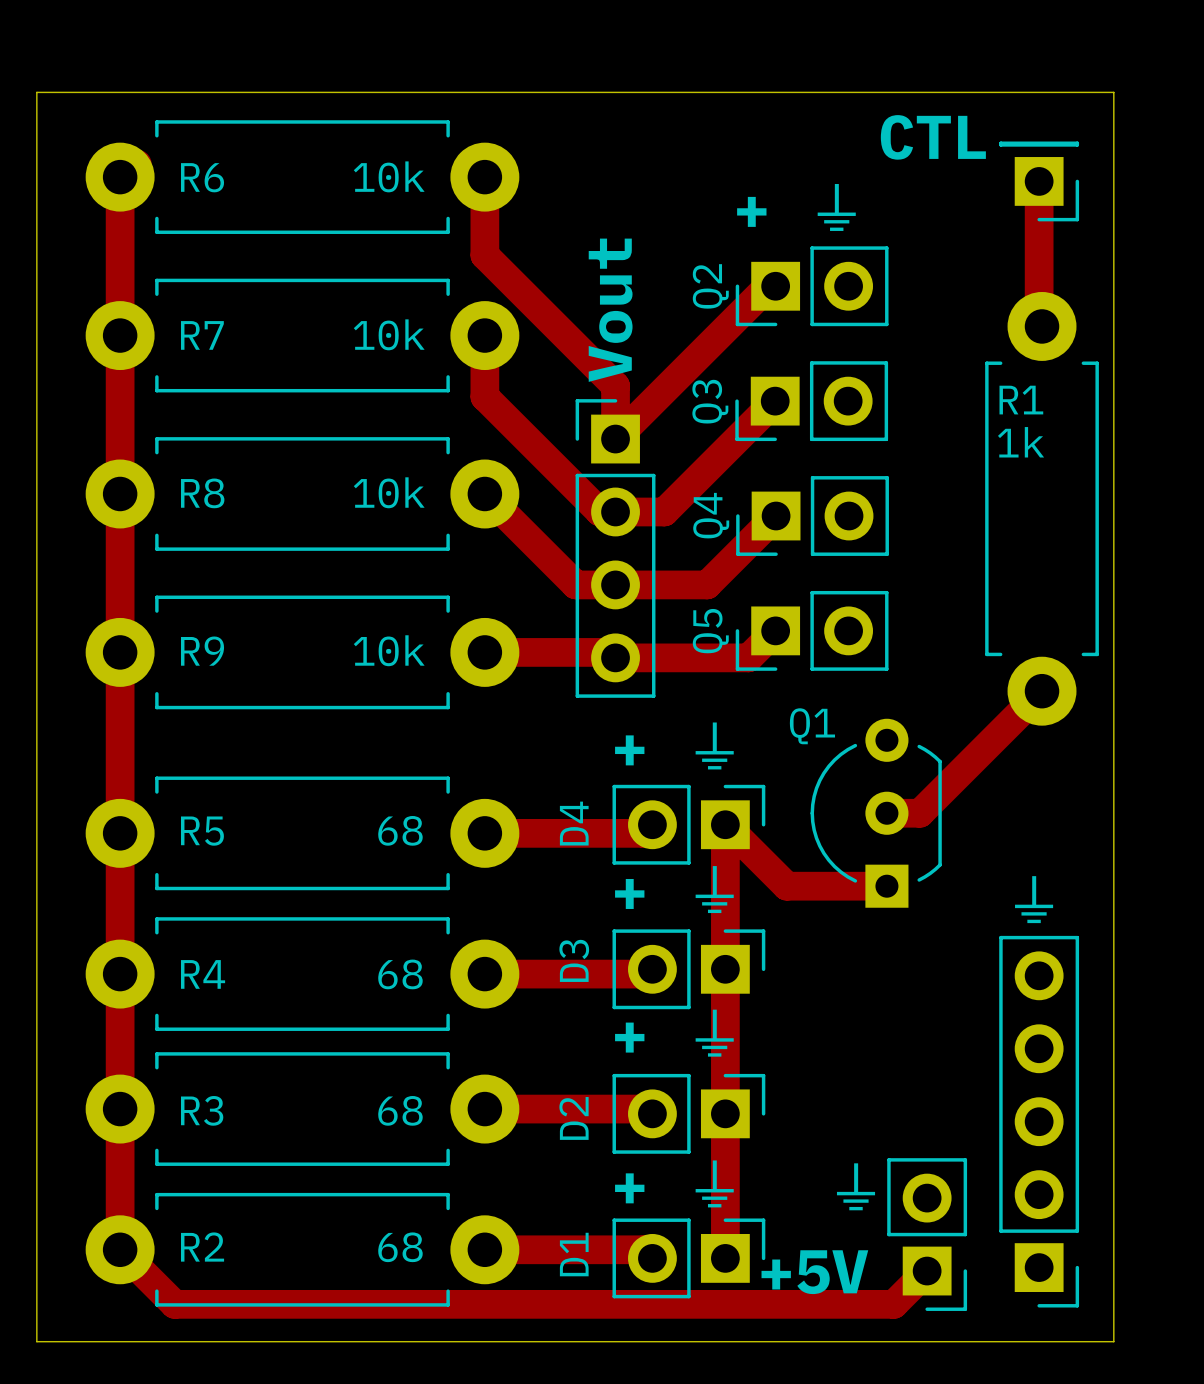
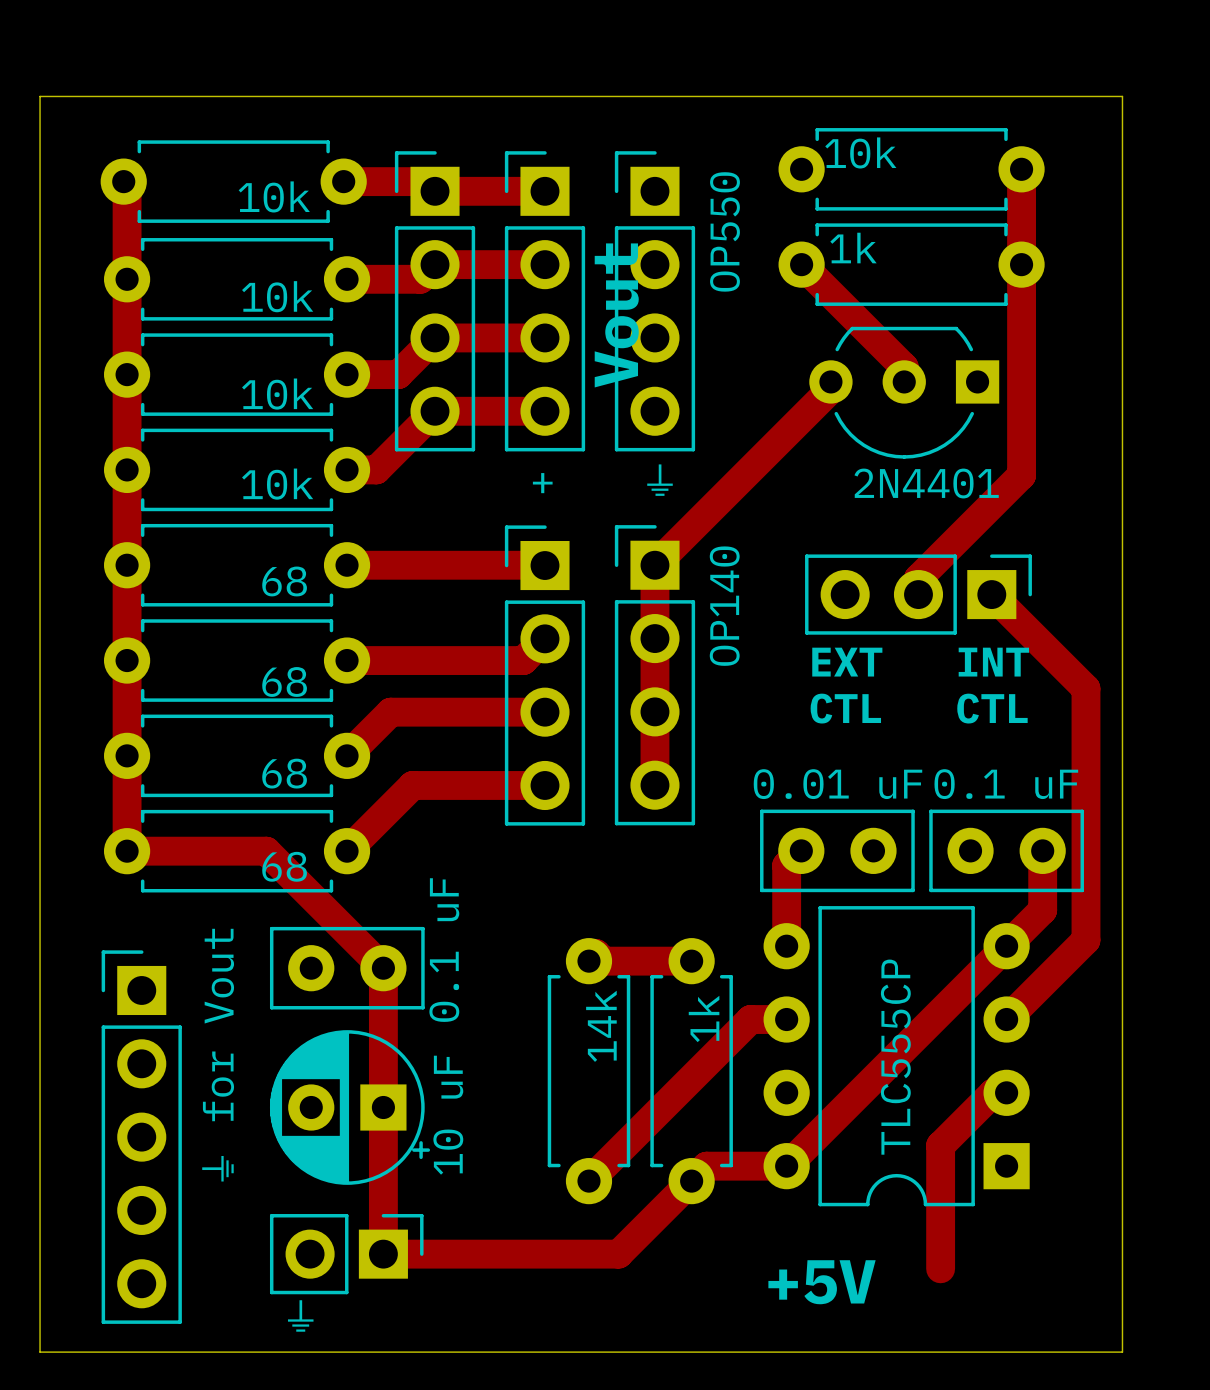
text: CTL (933, 137) -> none
track: (137, 164) (124, 177) (120, 177) (120, 1249) (174, 1304) (893, 1304) (927, 1271) -> none
part: none -> 10k (911, 169)
track: none -> (1021, 169) (1021, 475) (918, 578) (918, 594)
track: none -> (127, 176) (123, 180) (127, 184) (127, 851) (266, 851) (383, 968) (383, 1254) (618, 1254) (706, 1166) (786, 1166) (1042, 910) (1042, 850)
part: none -> 10k (233, 181)
R6: 10k (302, 177) -> none
track: none -> (343, 181) (425, 181) (435, 191) (545, 191)
track: (484, 177) (484, 255) (615, 385) (615, 439) (768, 286) (775, 286) -> none
track: (1039, 181) (1039, 323) (1042, 326) -> none
part: (1039, 181) -> none
text: + ⏚ (796, 207) -> none
text: none -> OP550 (724, 231)
track: none -> (545, 264) (435, 264) (420, 279) (347, 279)
track: none -> (801, 264) (904, 367) (904, 381)
part: none -> 1k (911, 264)
part: none -> 10k (237, 279)
Q2: (812, 286) -> none
part: none -> (435, 301)
part: none -> (545, 301)
part: none -> (654, 301)
track: none -> (545, 337) (435, 337) (398, 374) (347, 374)
R7: 10k (302, 335) -> none
track: (484, 335) (484, 396) (600, 511) (664, 511) (775, 401) -> none
part: none -> 10k (237, 374)
track: none -> (830, 381) (830, 389) (654, 565) (654, 785) (647, 777)
part: none -> 2N4401 (904, 392)
Q3: (811, 401) -> none
track: none -> (545, 411) (435, 411) (376, 469) (347, 469)
part: none -> 10k (237, 469)
text: none -> ⏚ (660, 480)
text: none -> + (542, 483)
R8: 10k (302, 493) -> none
track: (484, 493) (575, 584) (707, 584) (776, 516) -> none
R1: 1k (1042, 508) -> none
Q4: (812, 516) -> none
part: (615, 548) -> none
part: none -> 68 (237, 565)
track: none -> (347, 565) (544, 565)
part: none -> (918, 594)
track: none -> (991, 594) (1085, 688) (1085, 940) (1006, 1019)
text: none -> OP140 (724, 606)
track: (775, 630) (748, 657) (615, 657) (610, 652) (484, 652) -> none
Q5: (812, 630) -> none
track: none -> (545, 638) (523, 660) (347, 660)
R9: 10k (302, 652) -> none
part: none -> 68 (237, 660)
text: none -> EXT (847, 662)
text: none -> INT (993, 662)
part: none -> (545, 675)
part: none -> (654, 675)
track: (1042, 691) (919, 813) (886, 813) -> none
text: none -> CTL (845, 708)
text: none -> CTL (992, 708)
track: none -> (545, 712) (390, 712) (347, 755)
text: + ⏚ (674, 745) -> none
part: none -> 68 (237, 755)
track: none -> (545, 785) (412, 785) (347, 851)
Q1: (876, 813) -> none
track: (652, 824) (643, 833) (484, 833) -> none
D4: (688, 824) -> none
R5: 68 (302, 833) -> none
part: none -> 68 (237, 851)
track: none -> (801, 850) (786, 865) (786, 946)
part: none -> 0.01 uF (837, 850)
part: none -> 0.1 uF (1006, 850)
track: (886, 886) (786, 886) (725, 824) (725, 1258) -> none
text: + ⏚ (674, 889) -> none
text: ⏚ (1034, 899) -> none
track: none -> (588, 960) (596, 953) (603, 961) (691, 961)
part: none -> 0.1 uF (347, 968)
track: (652, 969) (647, 974) (484, 974) -> none
D3: (688, 969) -> none
R4: 68 (302, 974) -> none
track: none -> (786, 1019) (750, 1019) (588, 1181)
text: + ⏚ (674, 1033) -> none
text: none -> ⏚ for Vout (218, 1055)
part: none -> TLC555CP (896, 1056)
part: none -> 14k (588, 1071)
part: none -> 1k (691, 1071)
track: none -> (1006, 1092) (993, 1092) (940, 1145) (940, 1268)
part: none -> 10 uF (349, 1107)
R3: 68 (302, 1109) -> none
track: (484, 1109) (647, 1109) (652, 1113) -> none
D2: (688, 1113) -> none
part: (1039, 1121) -> none
part: none -> (141, 1137)
text: + ⏚ (674, 1183) -> none
text: ⏚ (856, 1186) -> none
part rotation: 0° (927, 1234) -> 90° counterclockwise (346, 1254)
part position: (927, 1234) -> (346, 1254)
R2: 68 (302, 1249) -> none
track: (484, 1249) (643, 1249) (652, 1258) -> none
D1: (688, 1258) -> none
text: none -> ⏚ (300, 1315)

